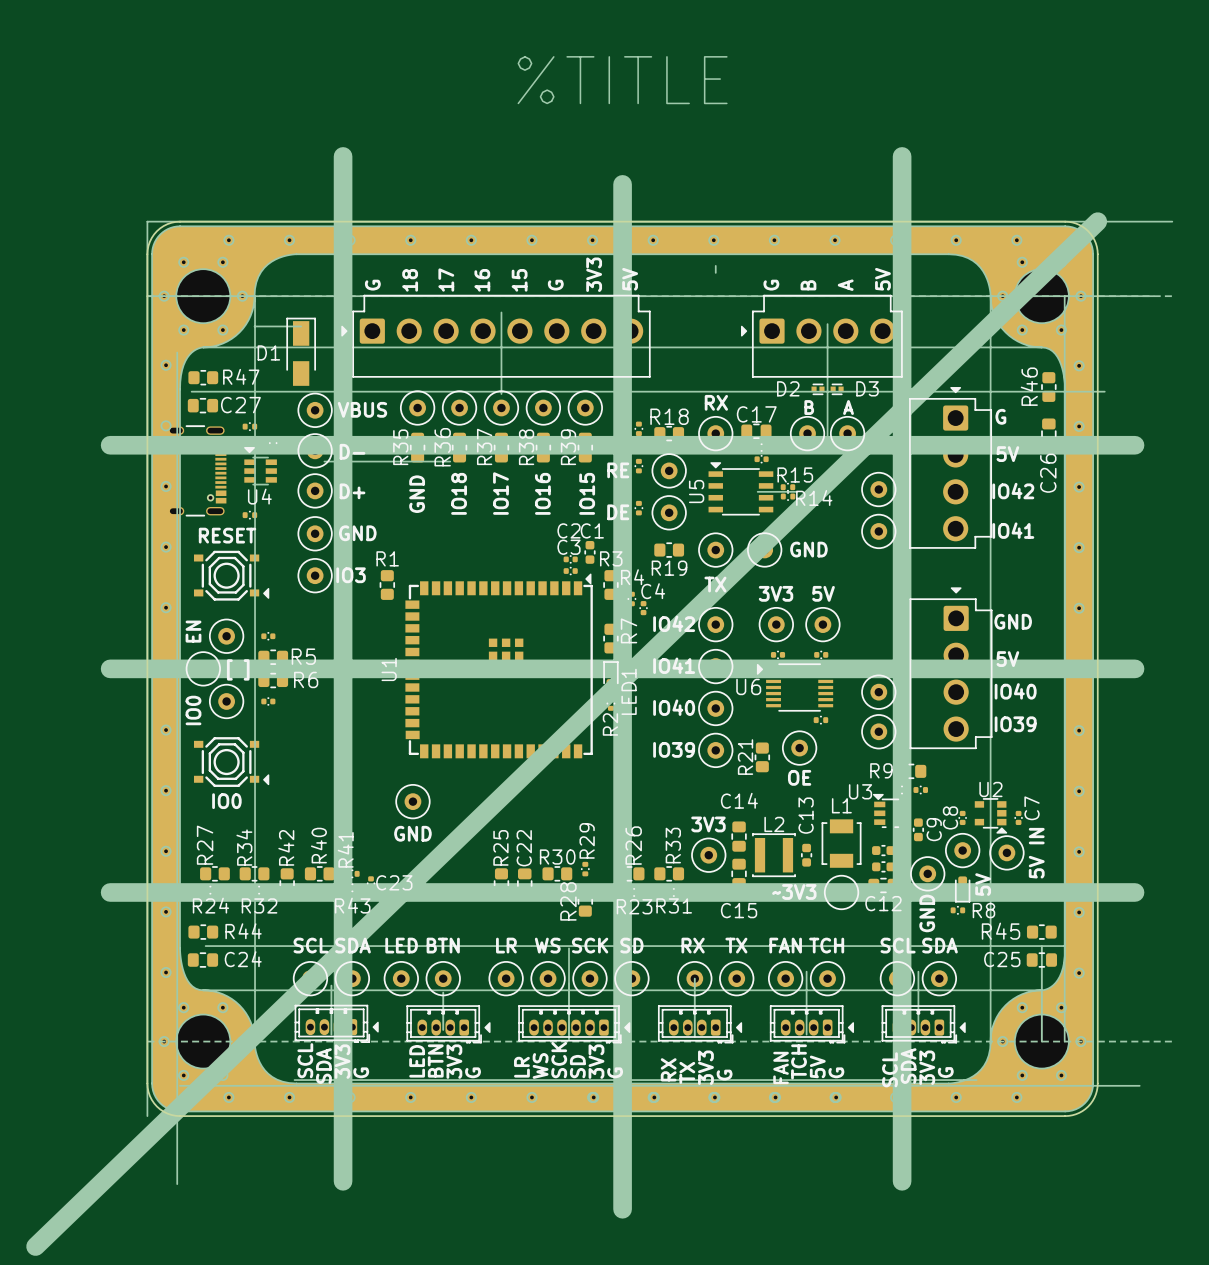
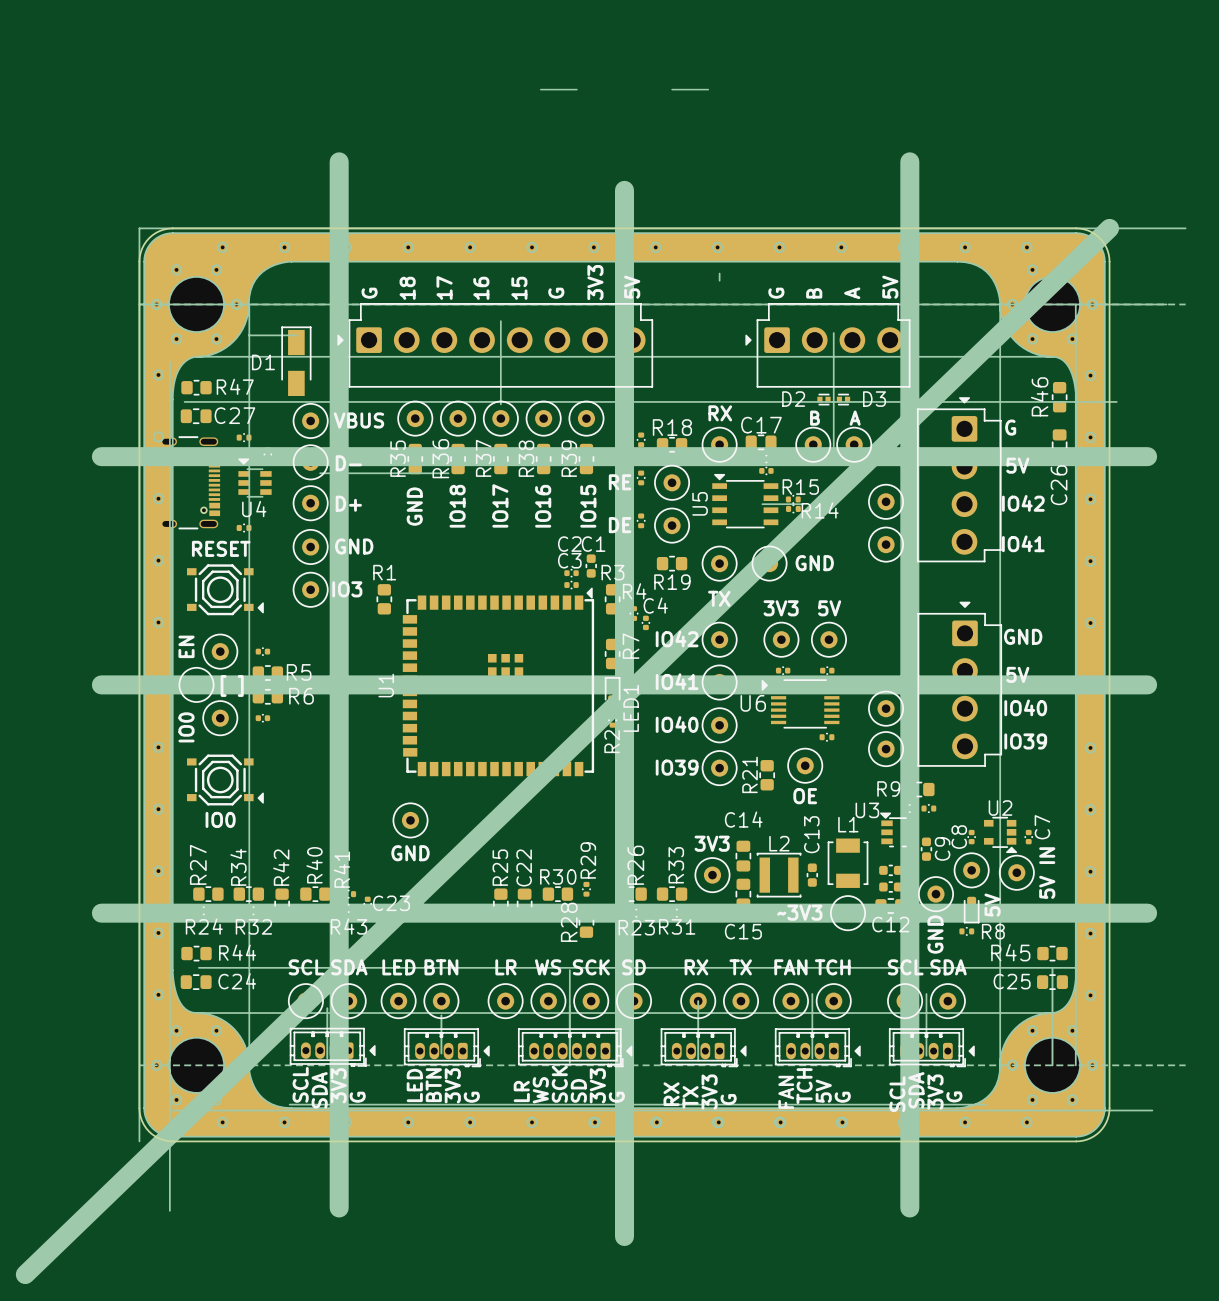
text: %TITLE (622, 80) -> - - (624, 89)

